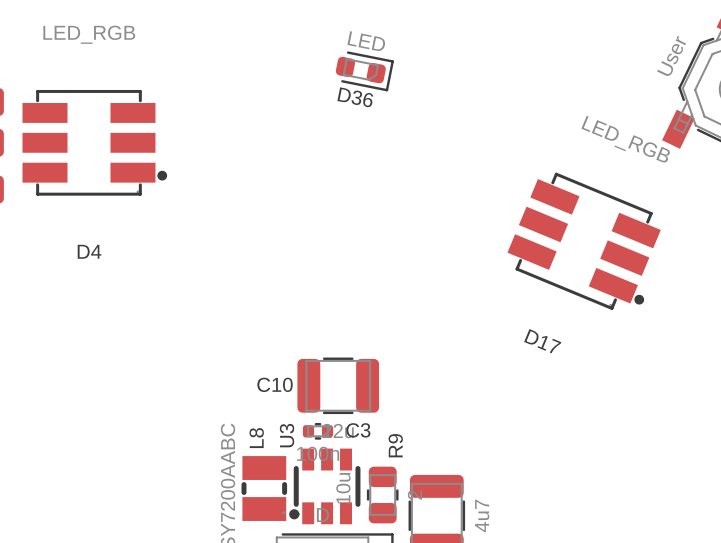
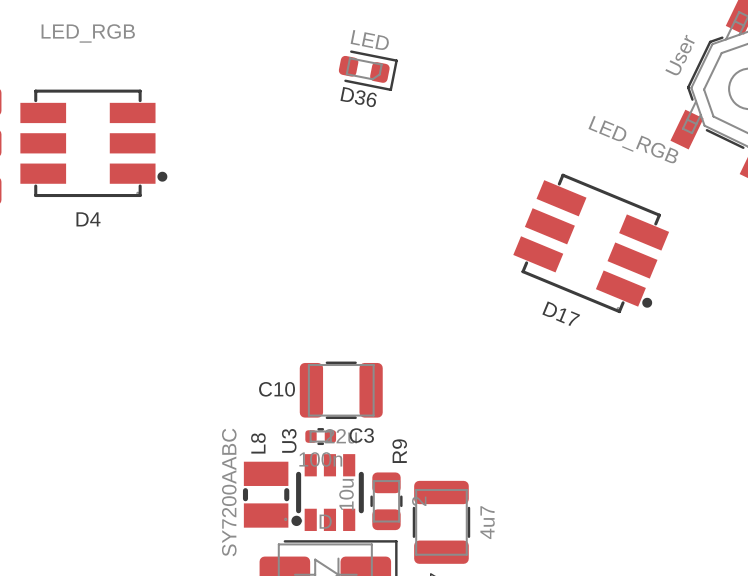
D4 name position: D4 (89, 251) -> D4 (88, 219)
D17 name position: D17 (542, 341) -> D17 (561, 313)

